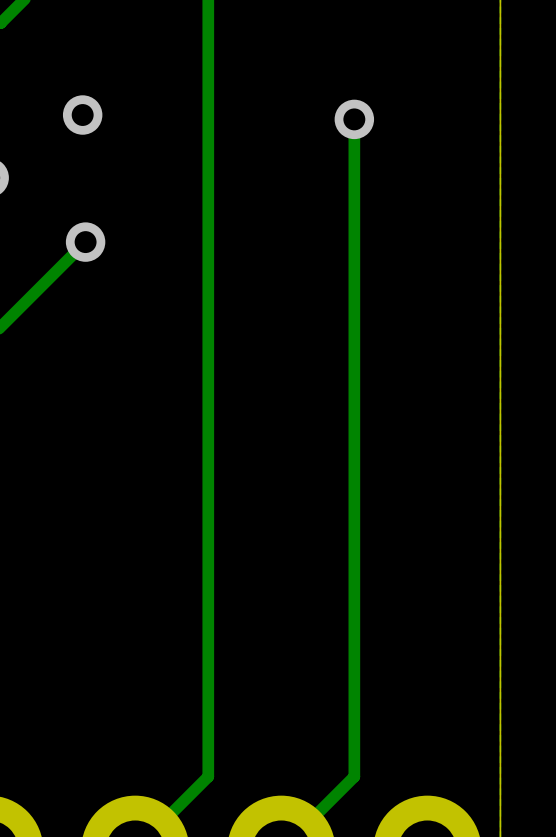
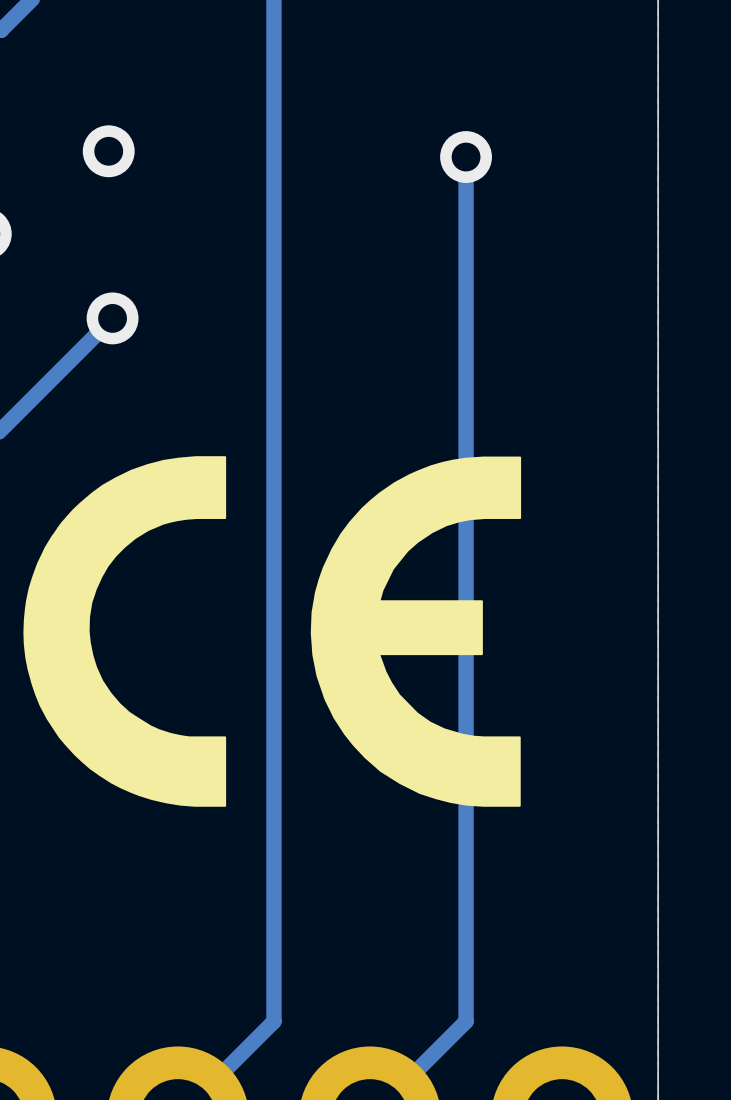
drawing: none -> [23, 456, 522, 807]

